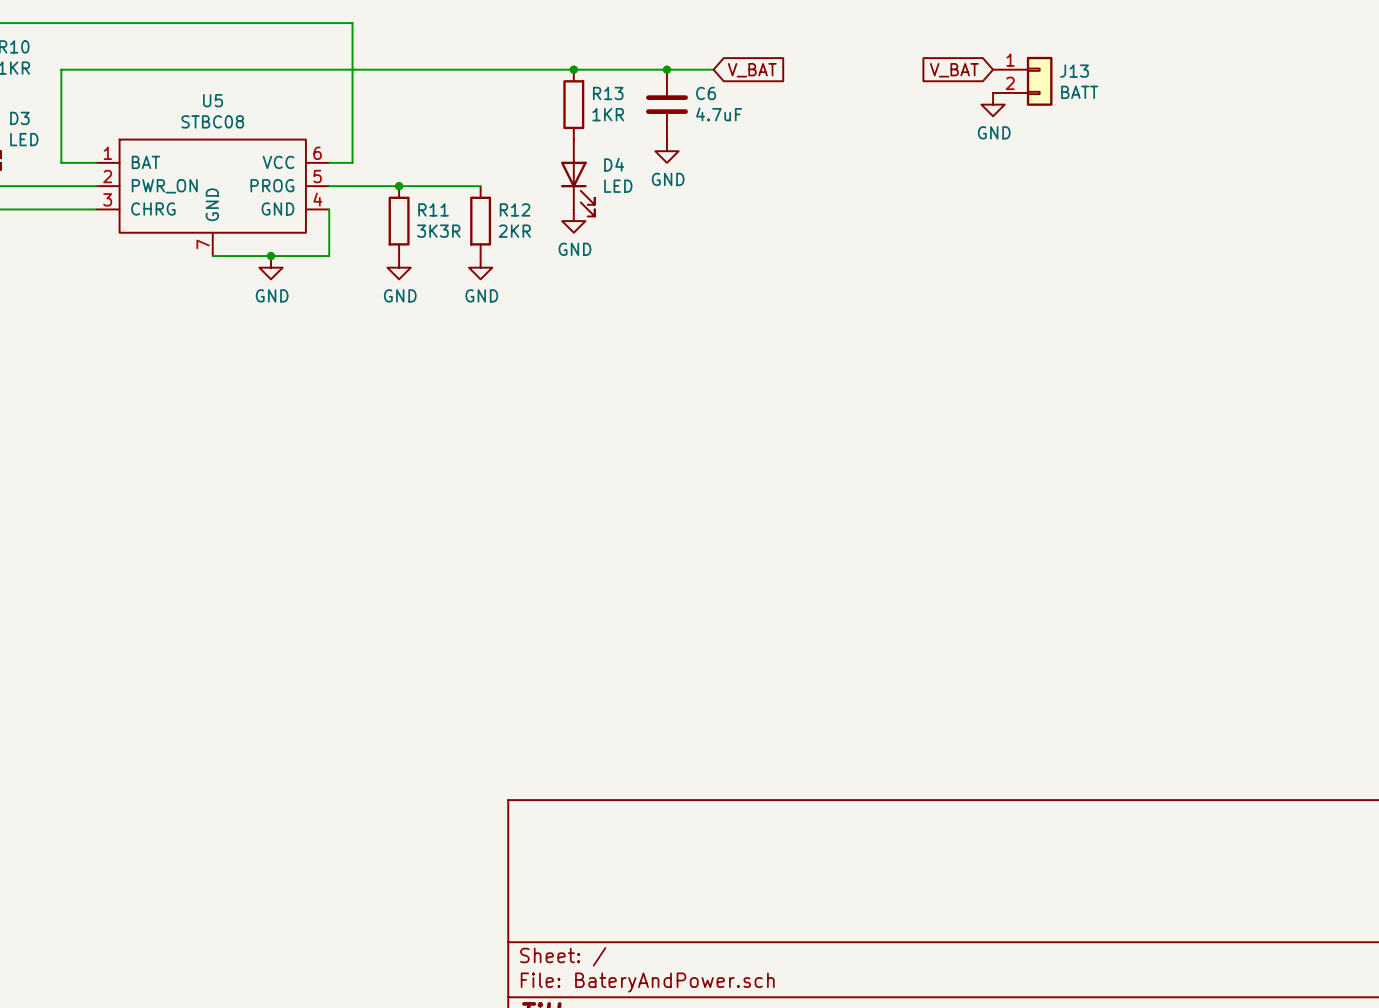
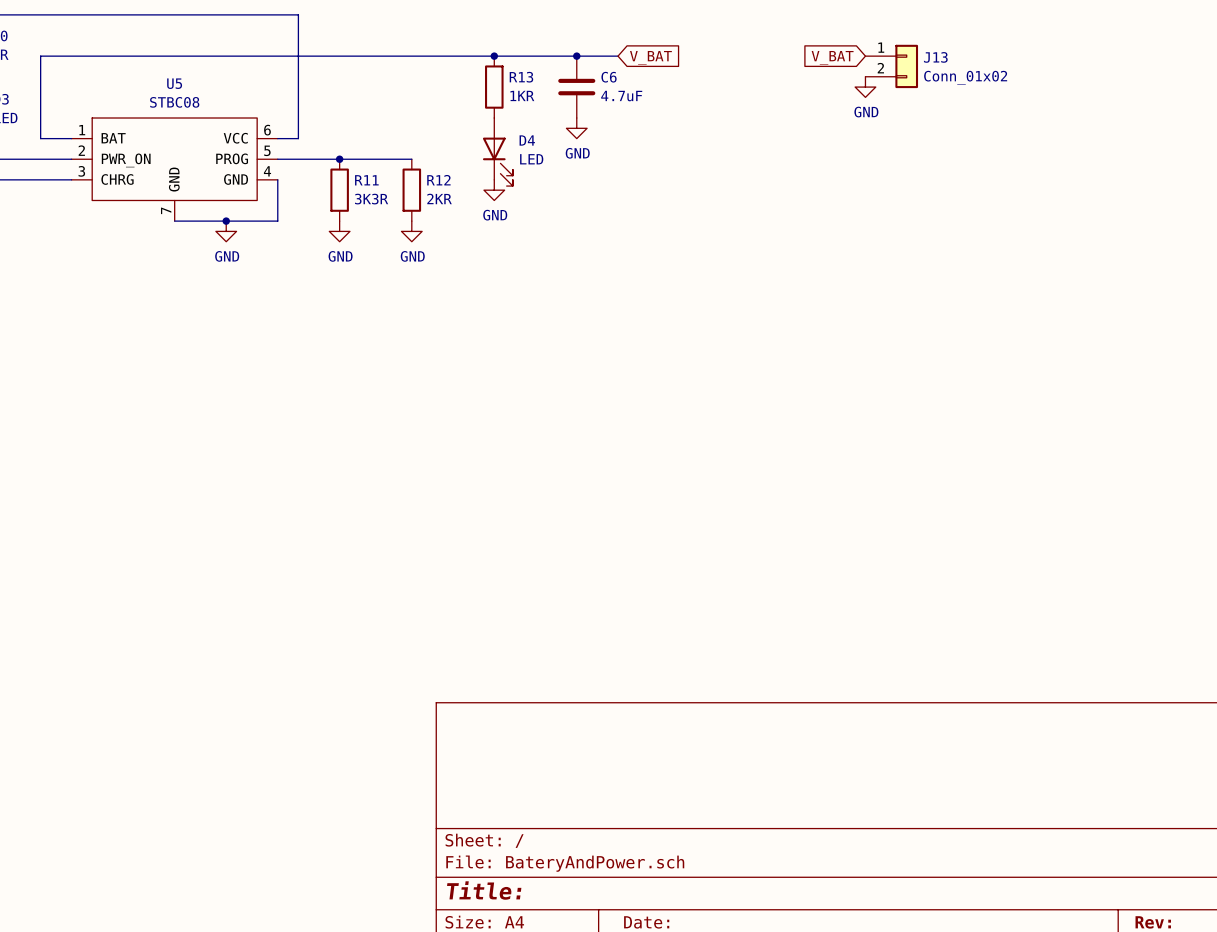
J13 value: BATT (1079, 92) -> Conn_01x02 (965, 77)

